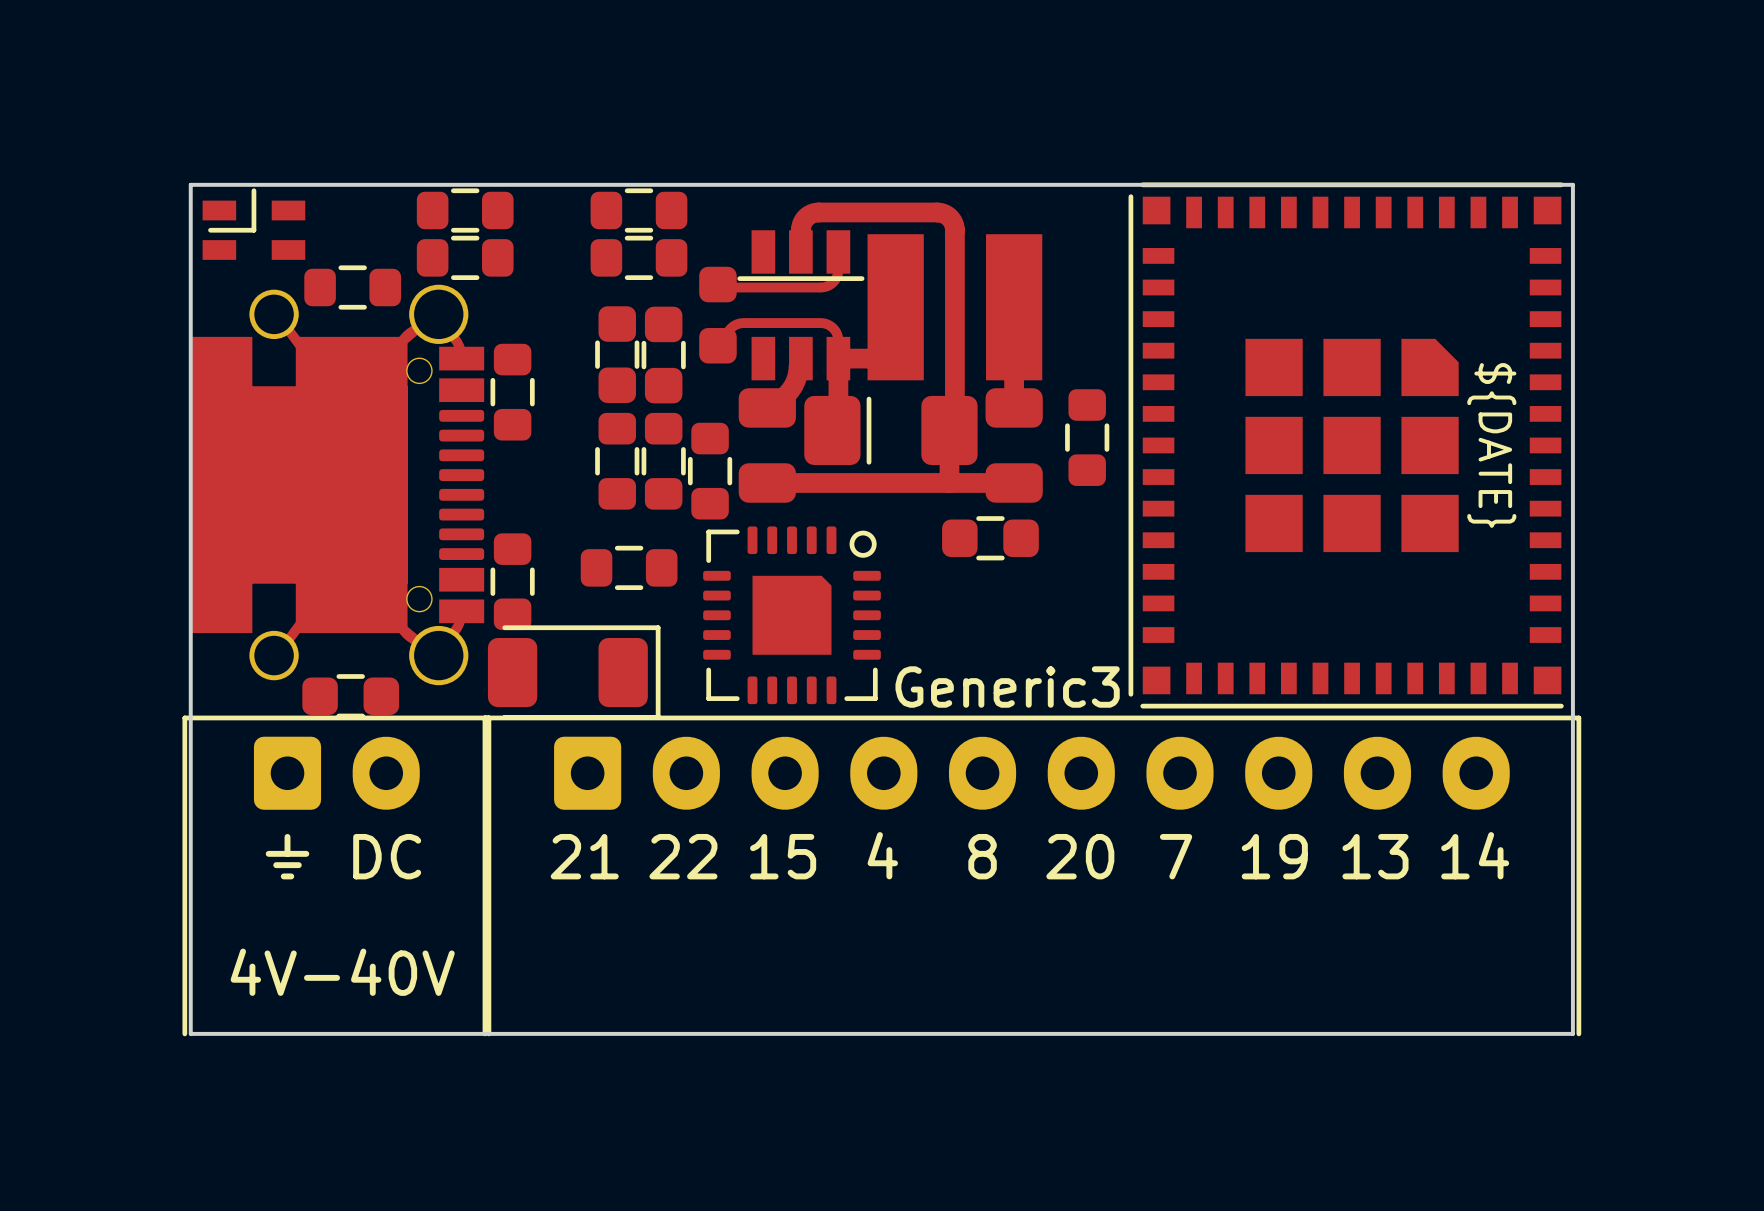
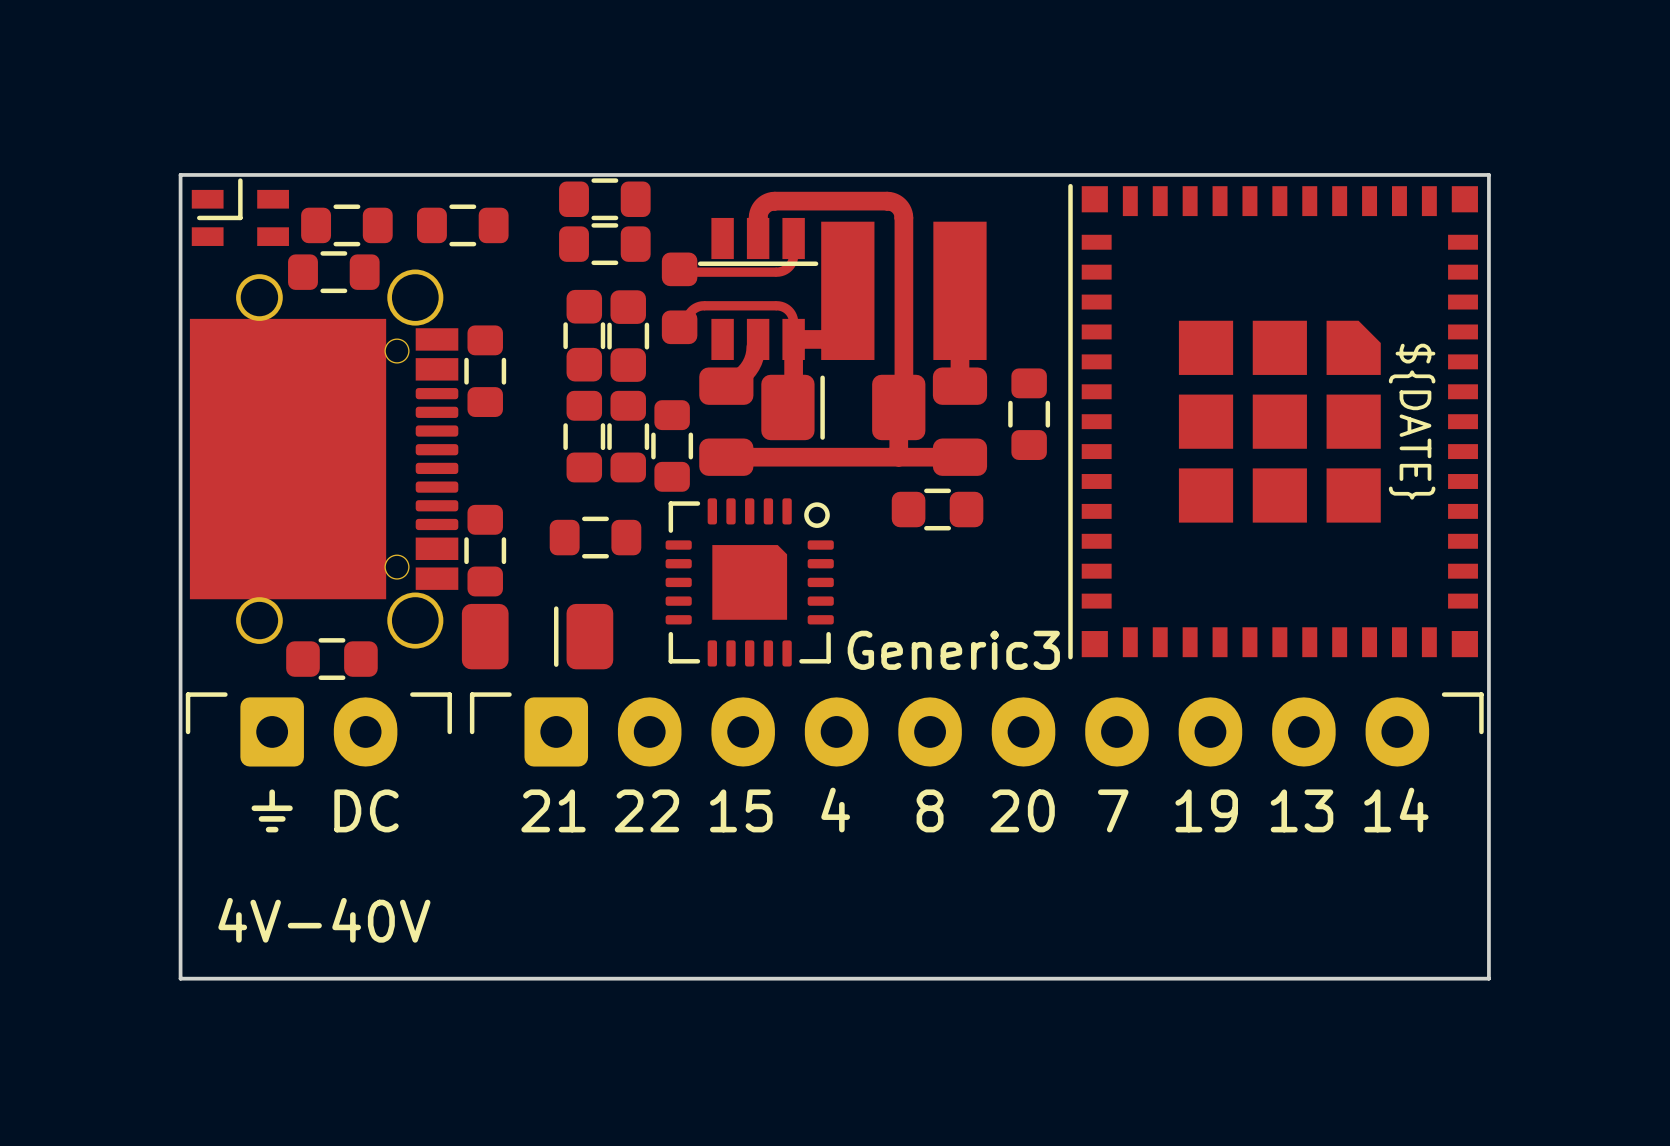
part footprint: [1128, 182, 1564, 709] -> [1068, 183, 1478, 660]
part: (465, 210) -> none
part: none -> (346, 225)
part: none -> (462, 225)
part: (465, 257) -> none
part footprint: [190, 284, 485, 686] -> [189, 269, 459, 649]
part footprint: [487, 625, 661, 720] -> [461, 603, 614, 670]
part: none -> (318, 729)
part: none -> (976, 729)
part: (336, 875) -> none
part: (1031, 875) -> none

